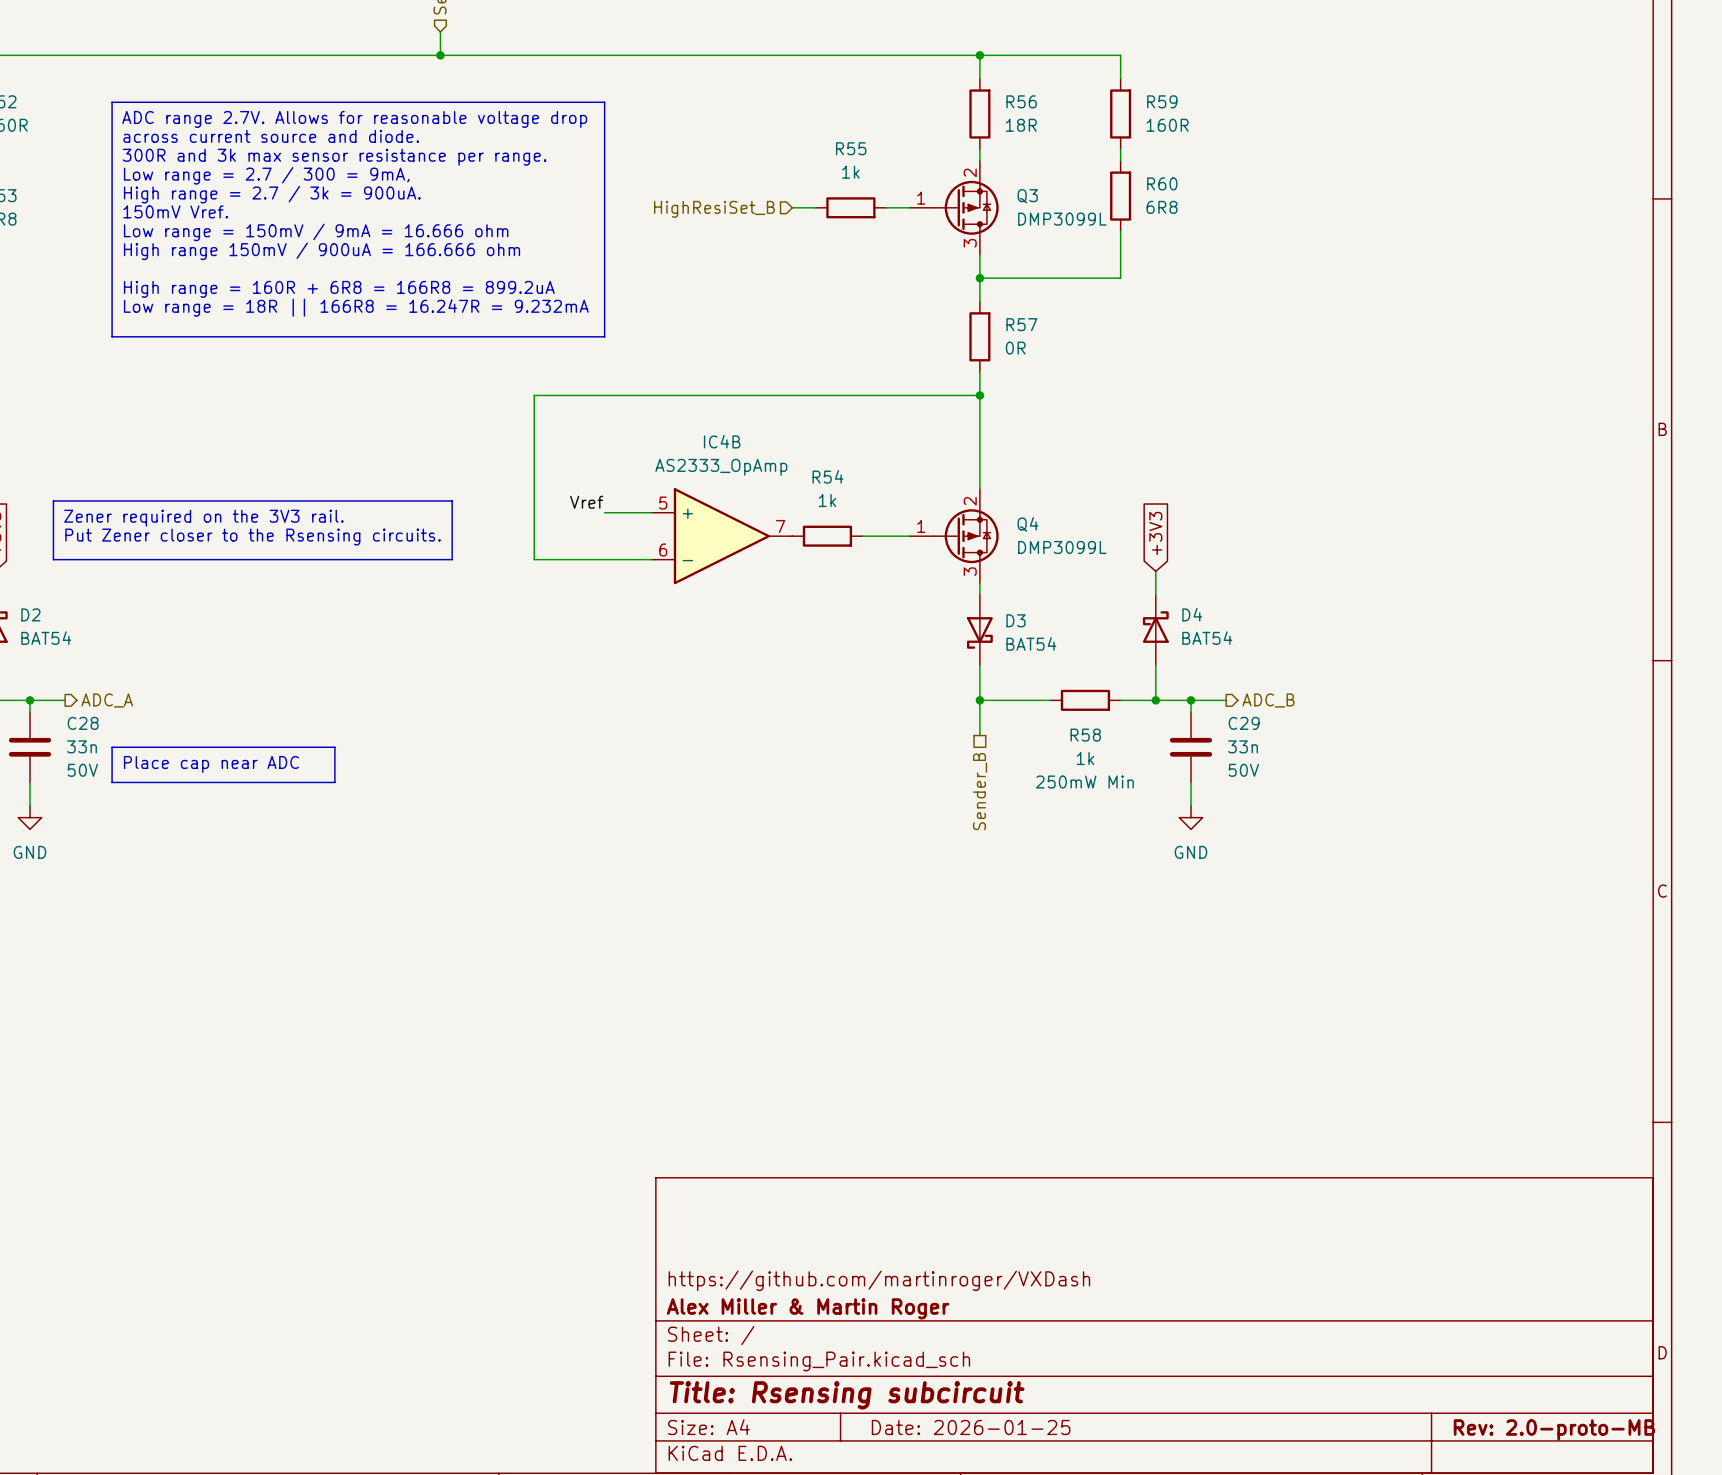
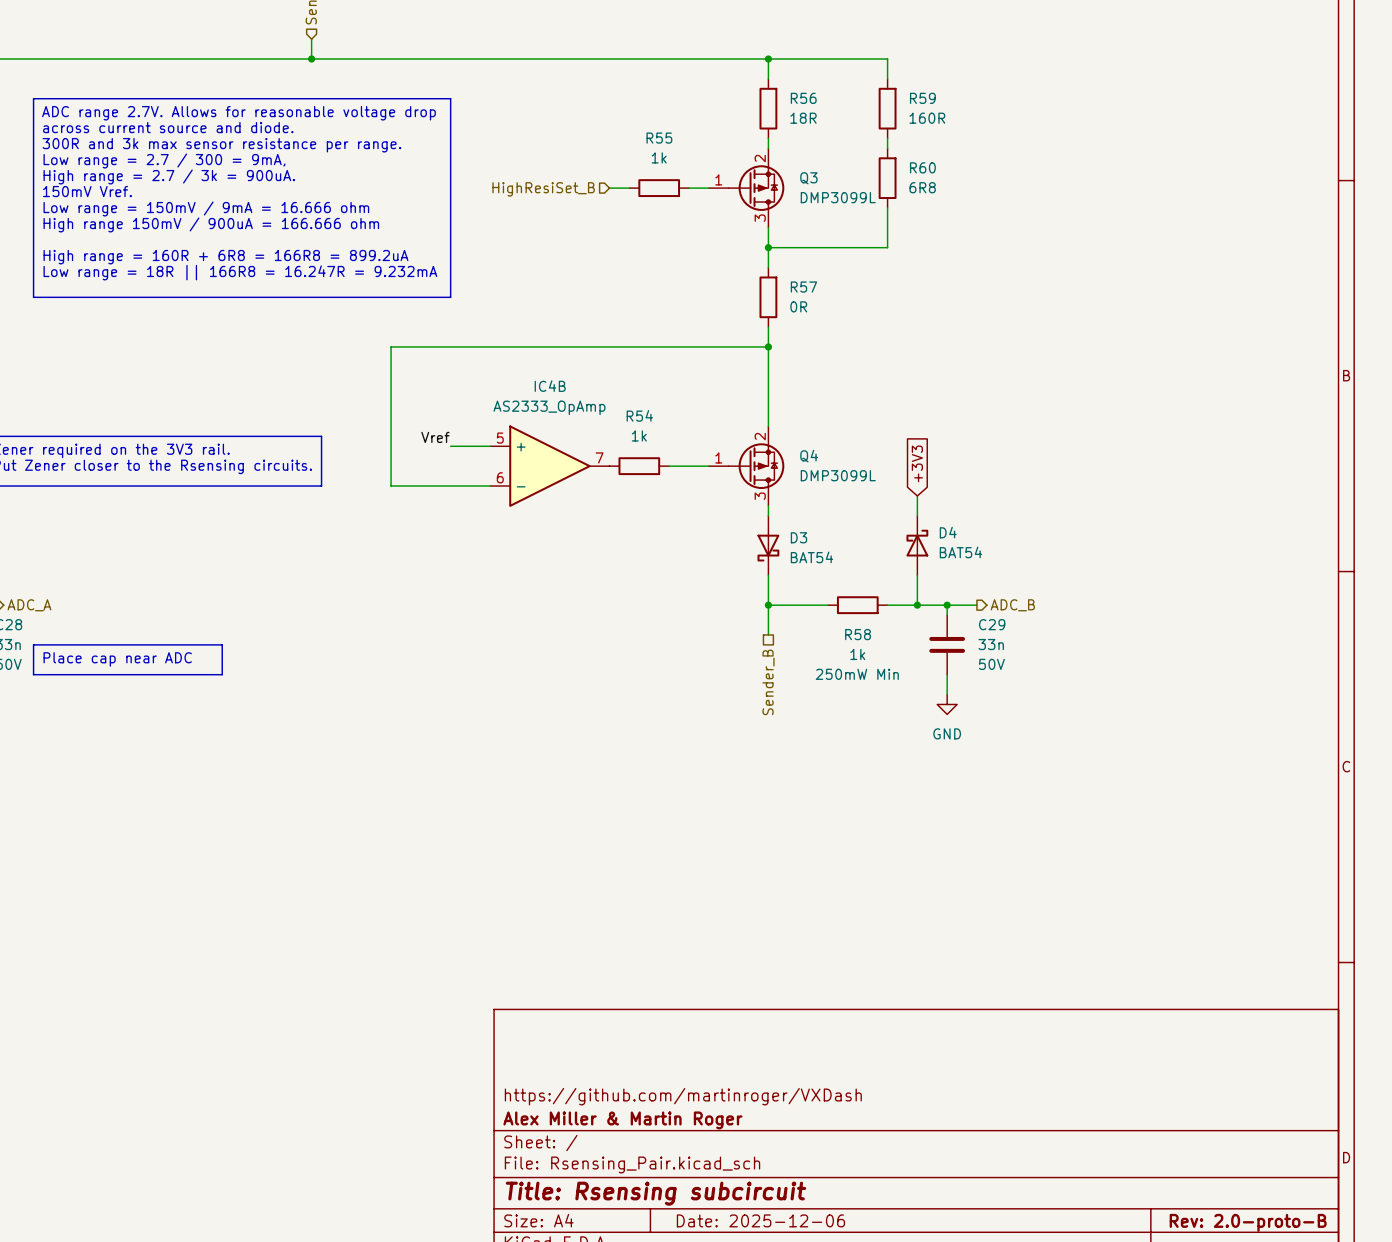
title block: Date: 2026-01-25 (971, 1427) -> Date: 2025-12-06 (760, 1220)
title block: Rev: 2.0-proto-MB (1554, 1429) -> Rev: 2.0-proto-B (1248, 1222)

